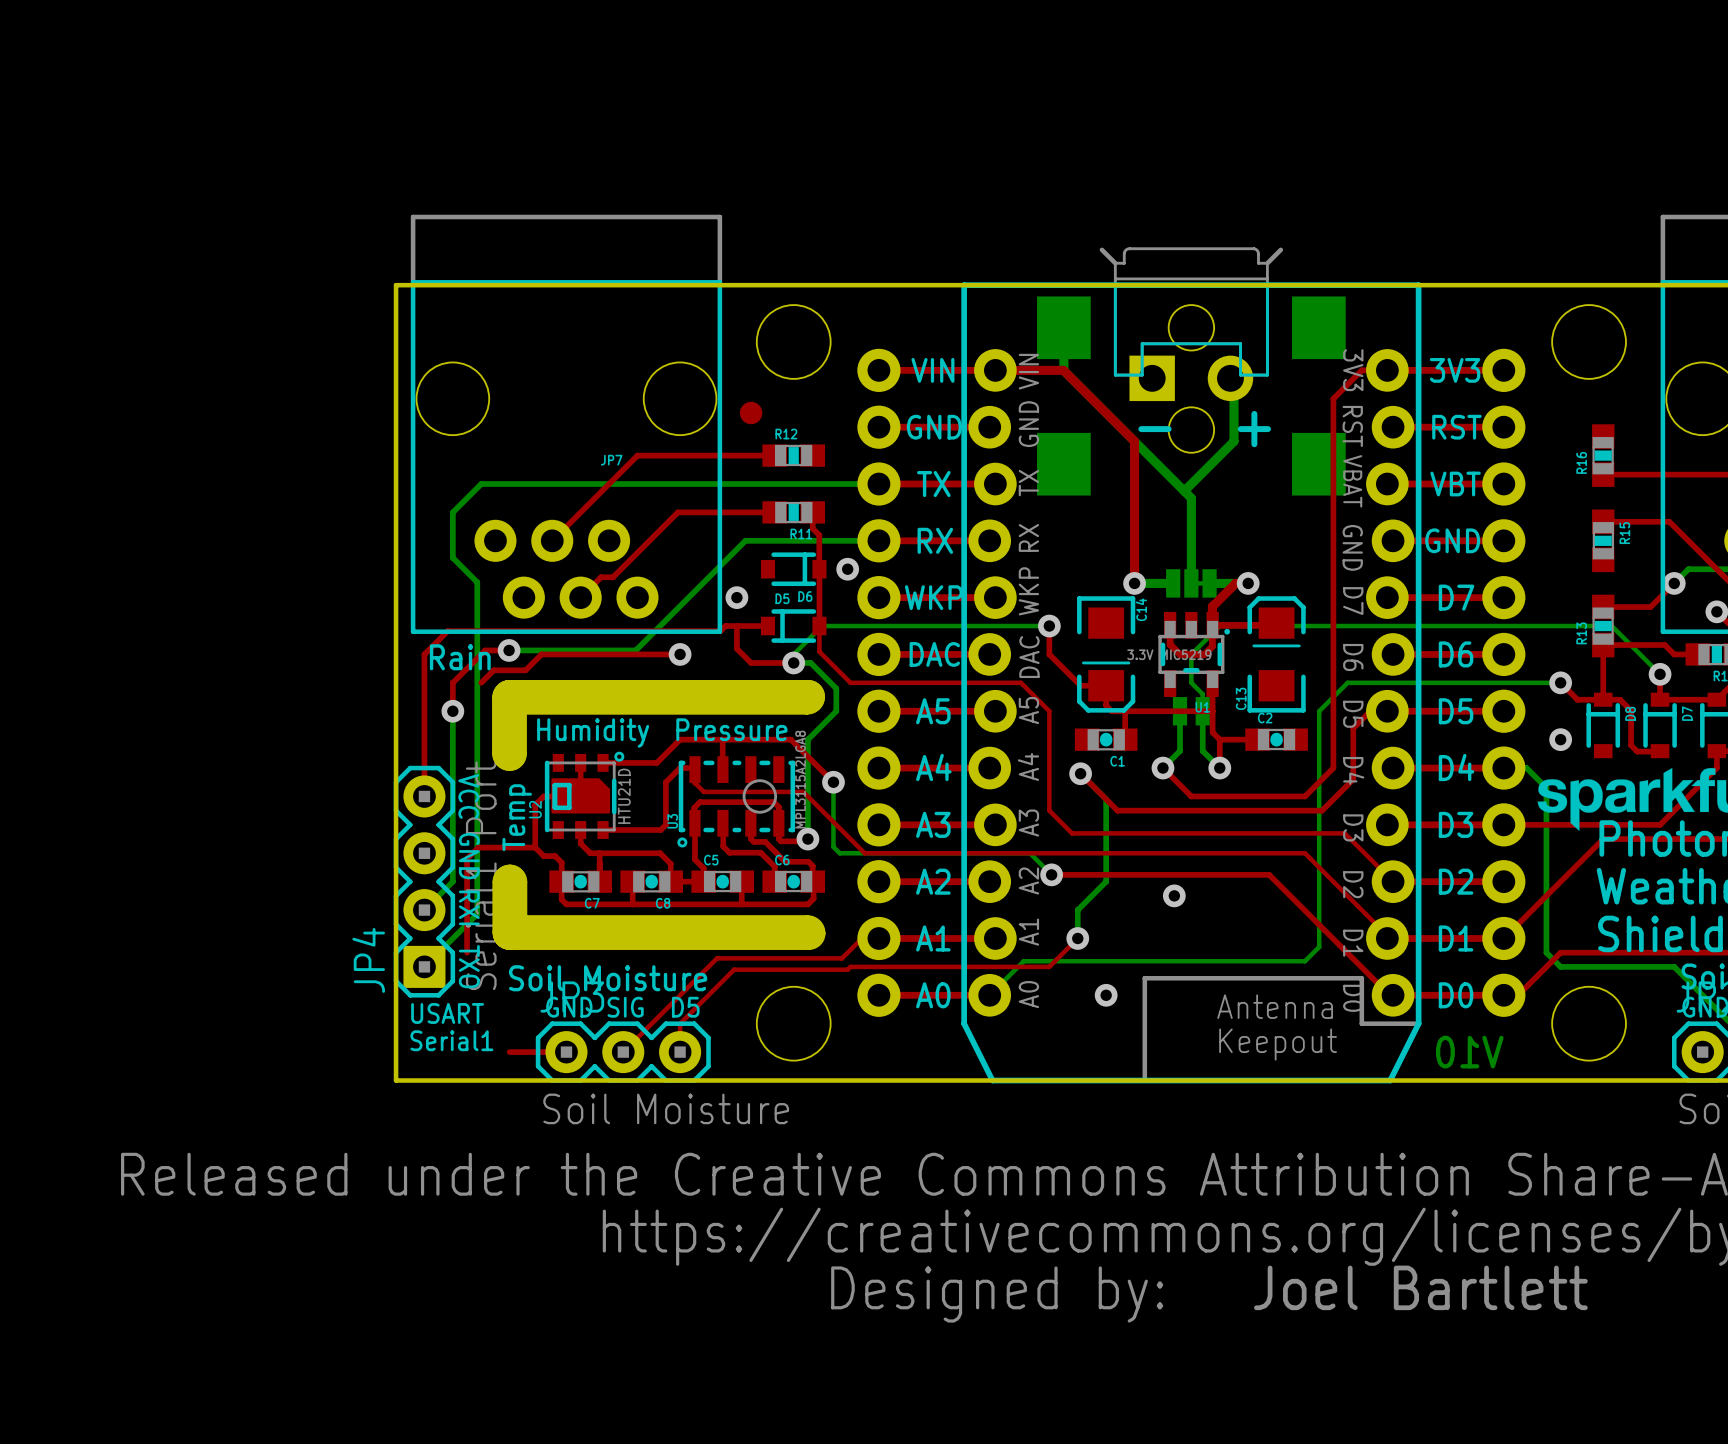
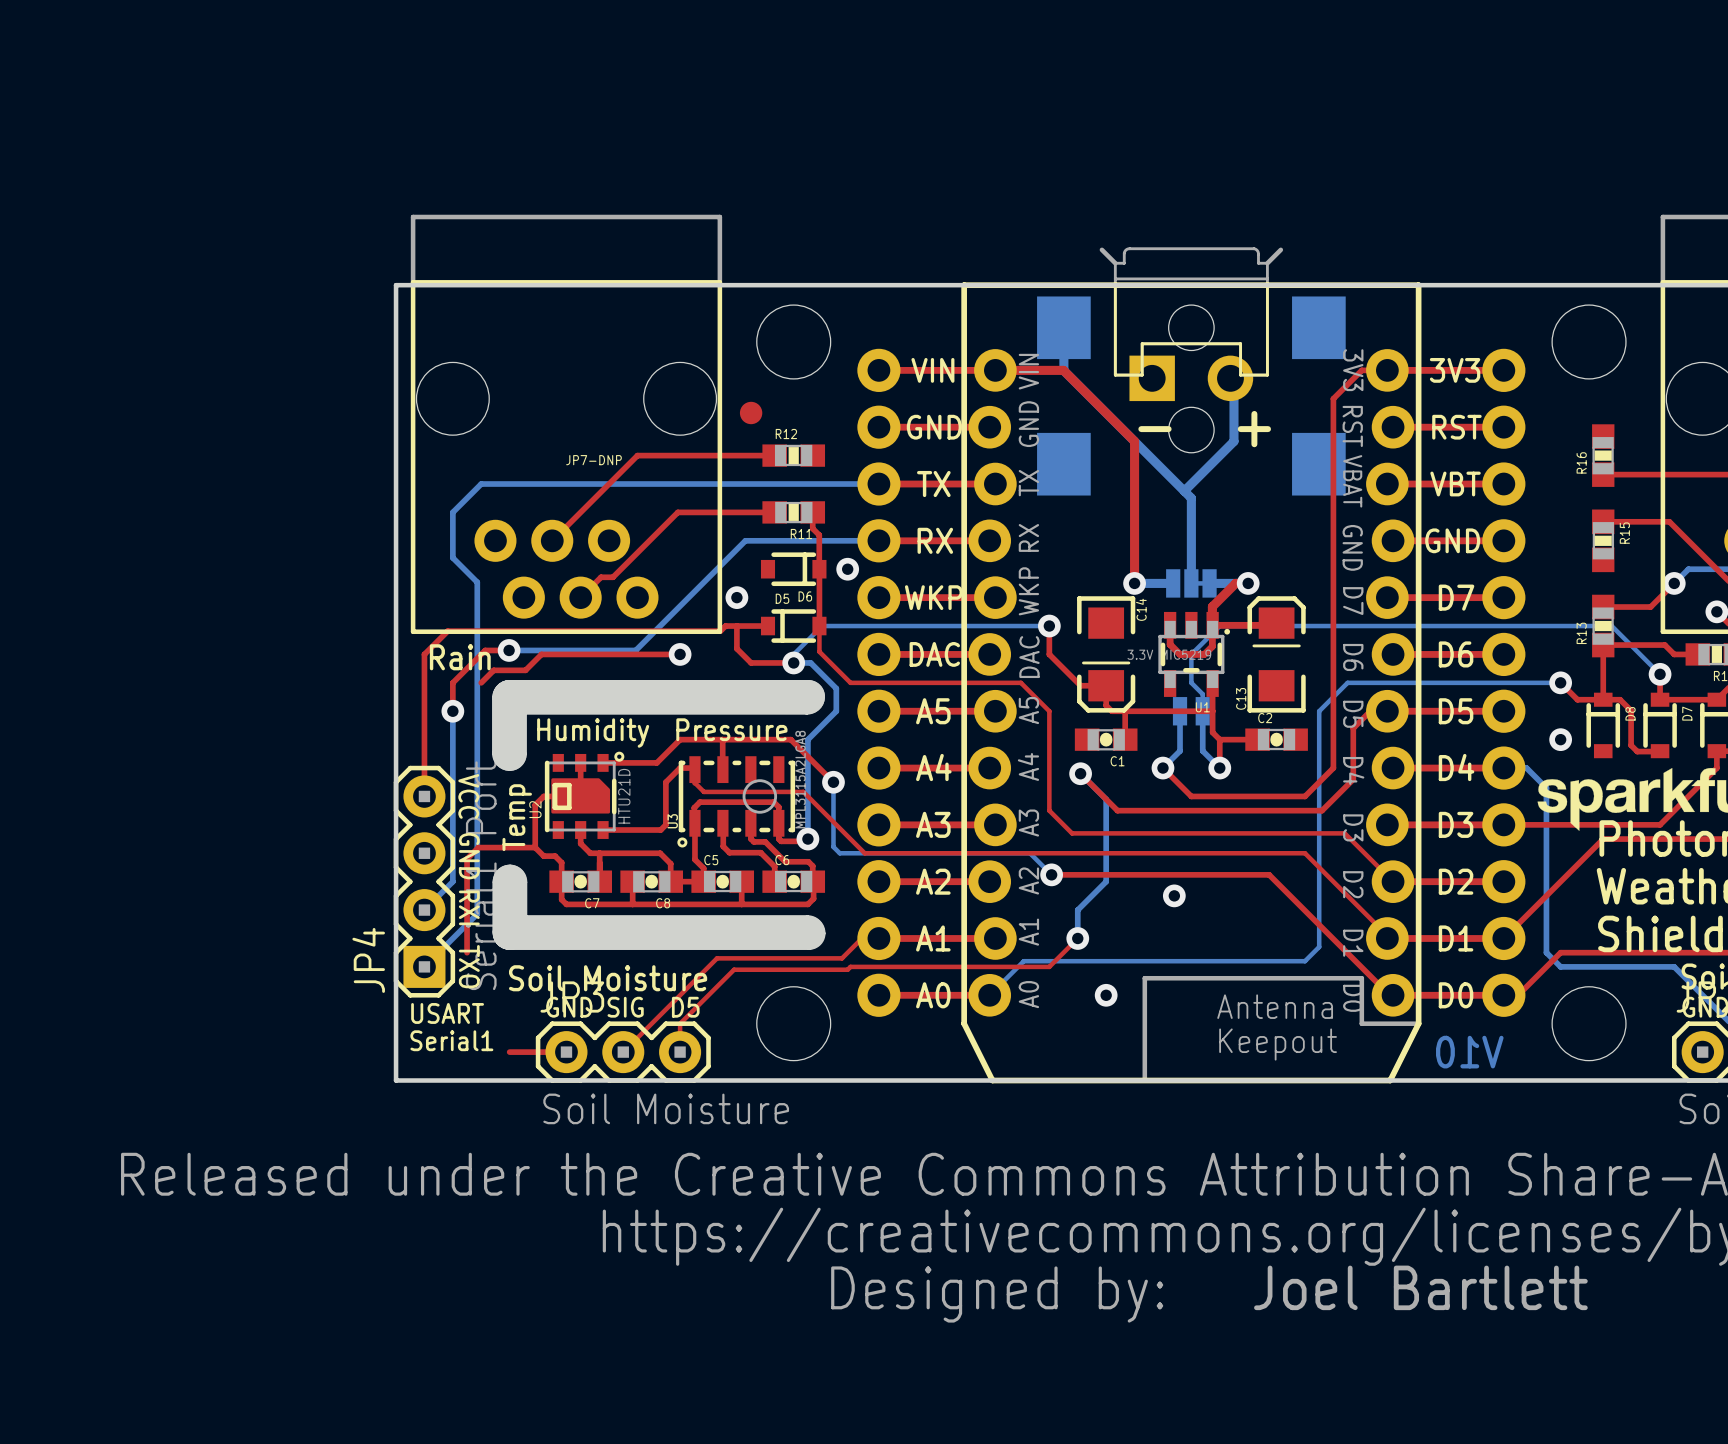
JP7 name: JP7 (611, 460) -> JP7-DNP (593, 460)

